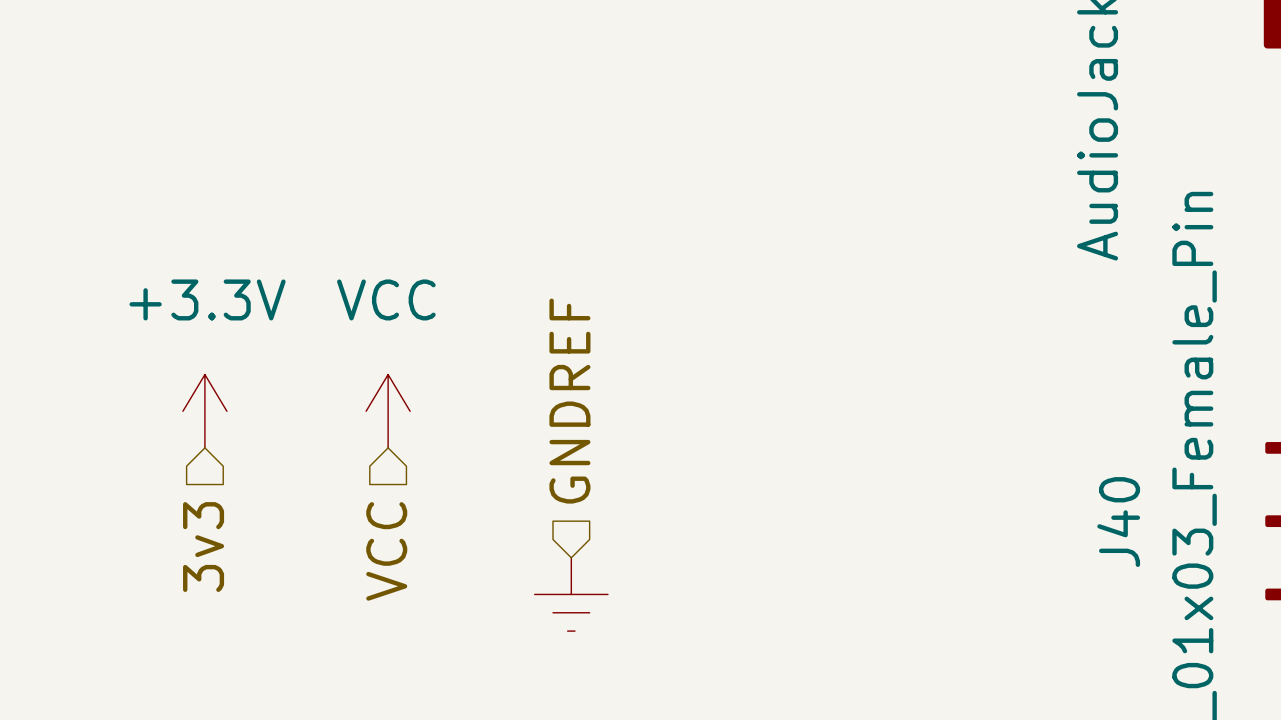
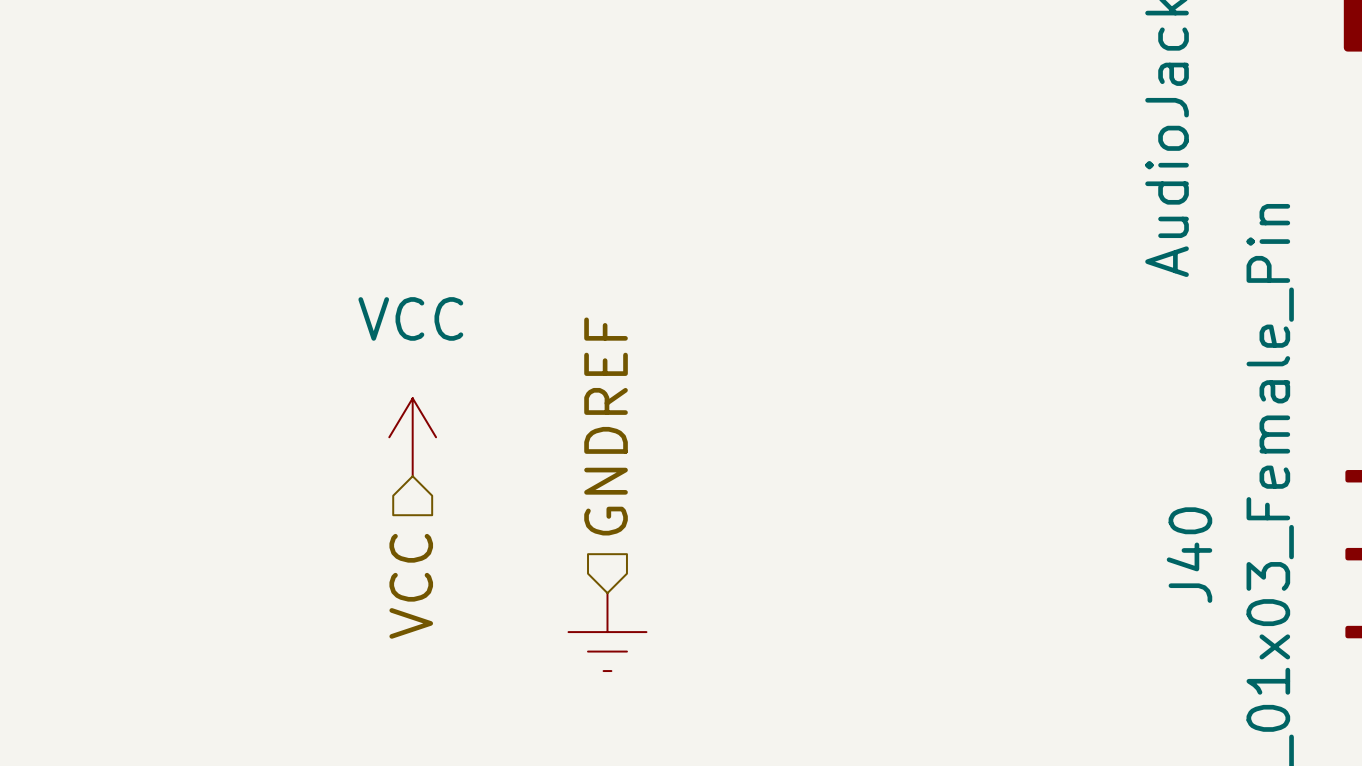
power symbol: +3.3V (204, 411) -> none
hierarchical label: 3v3 (203, 547) -> none

